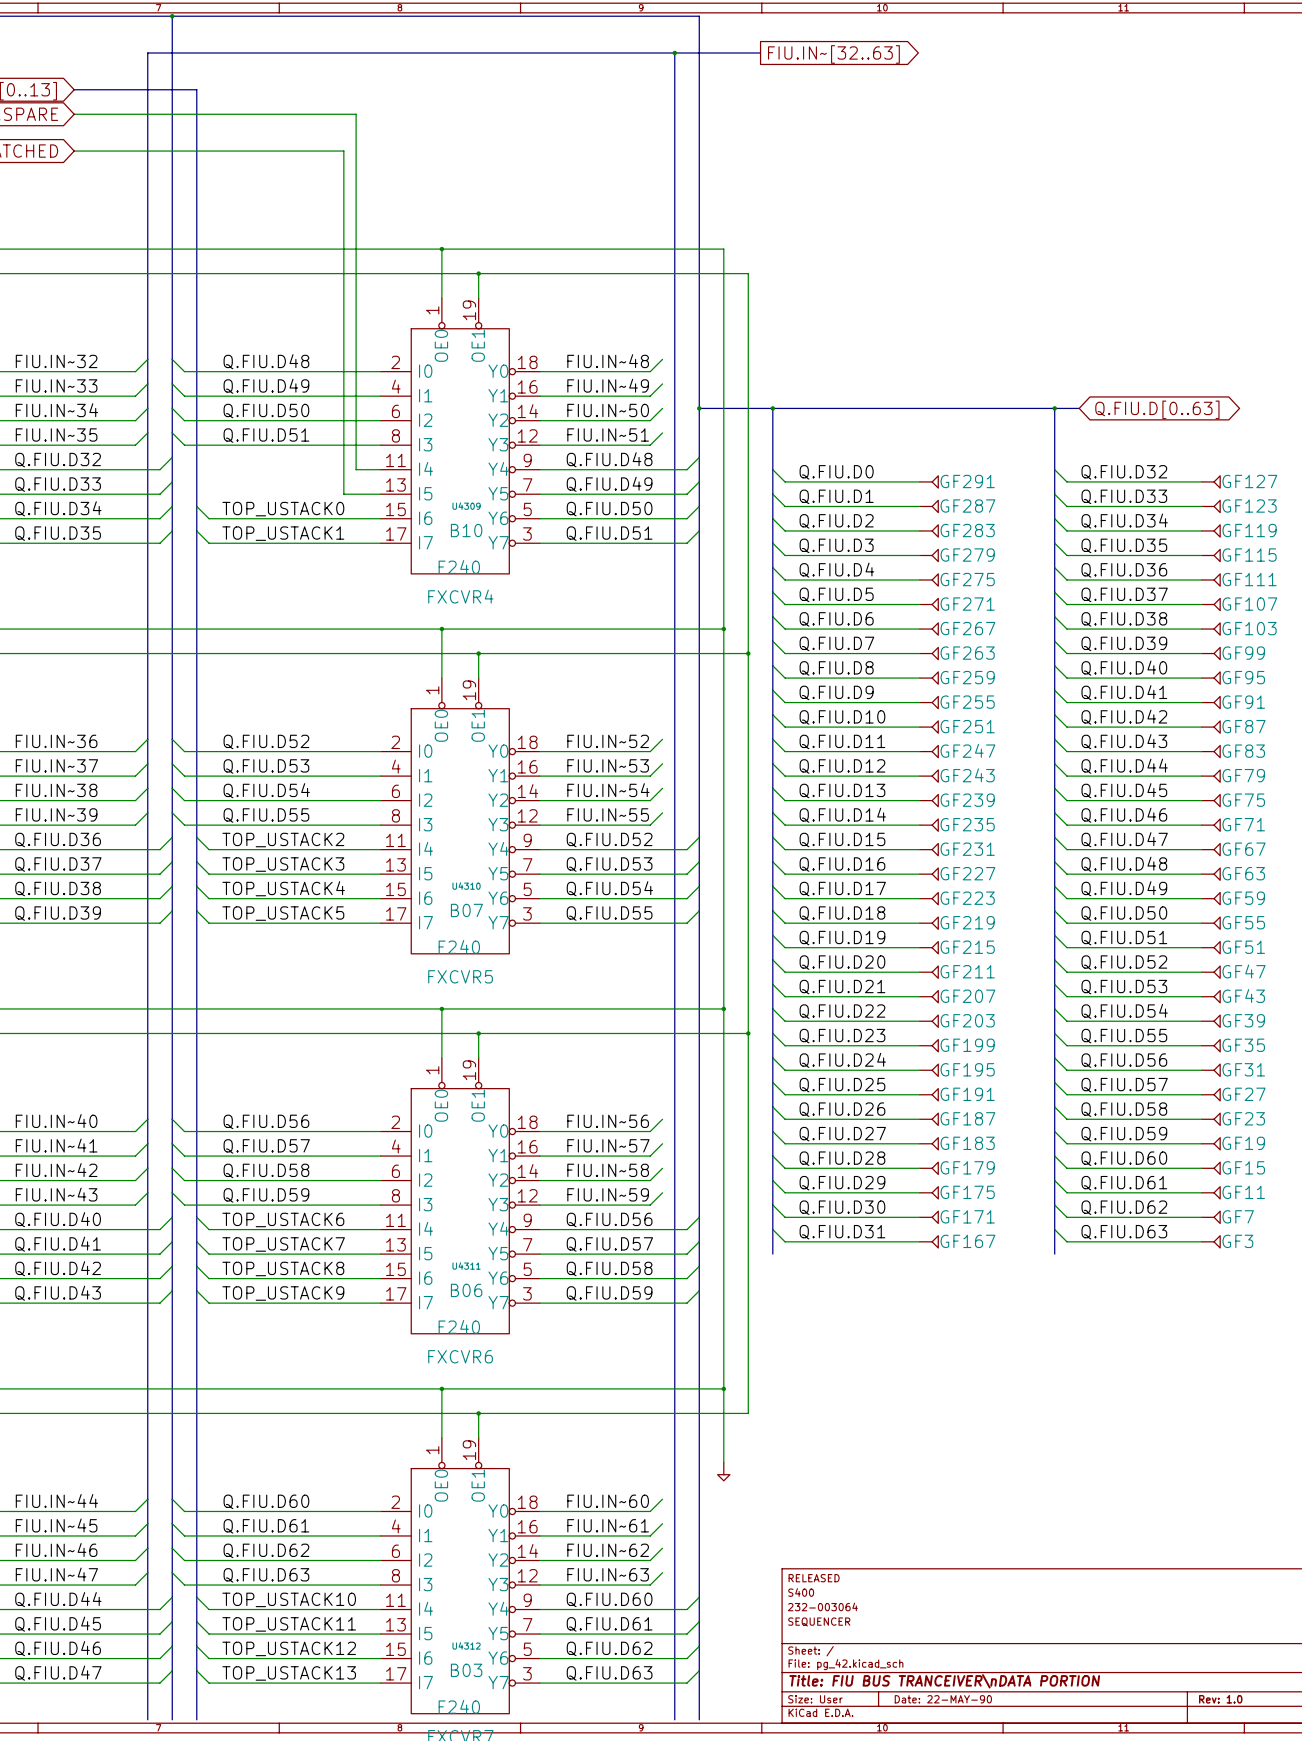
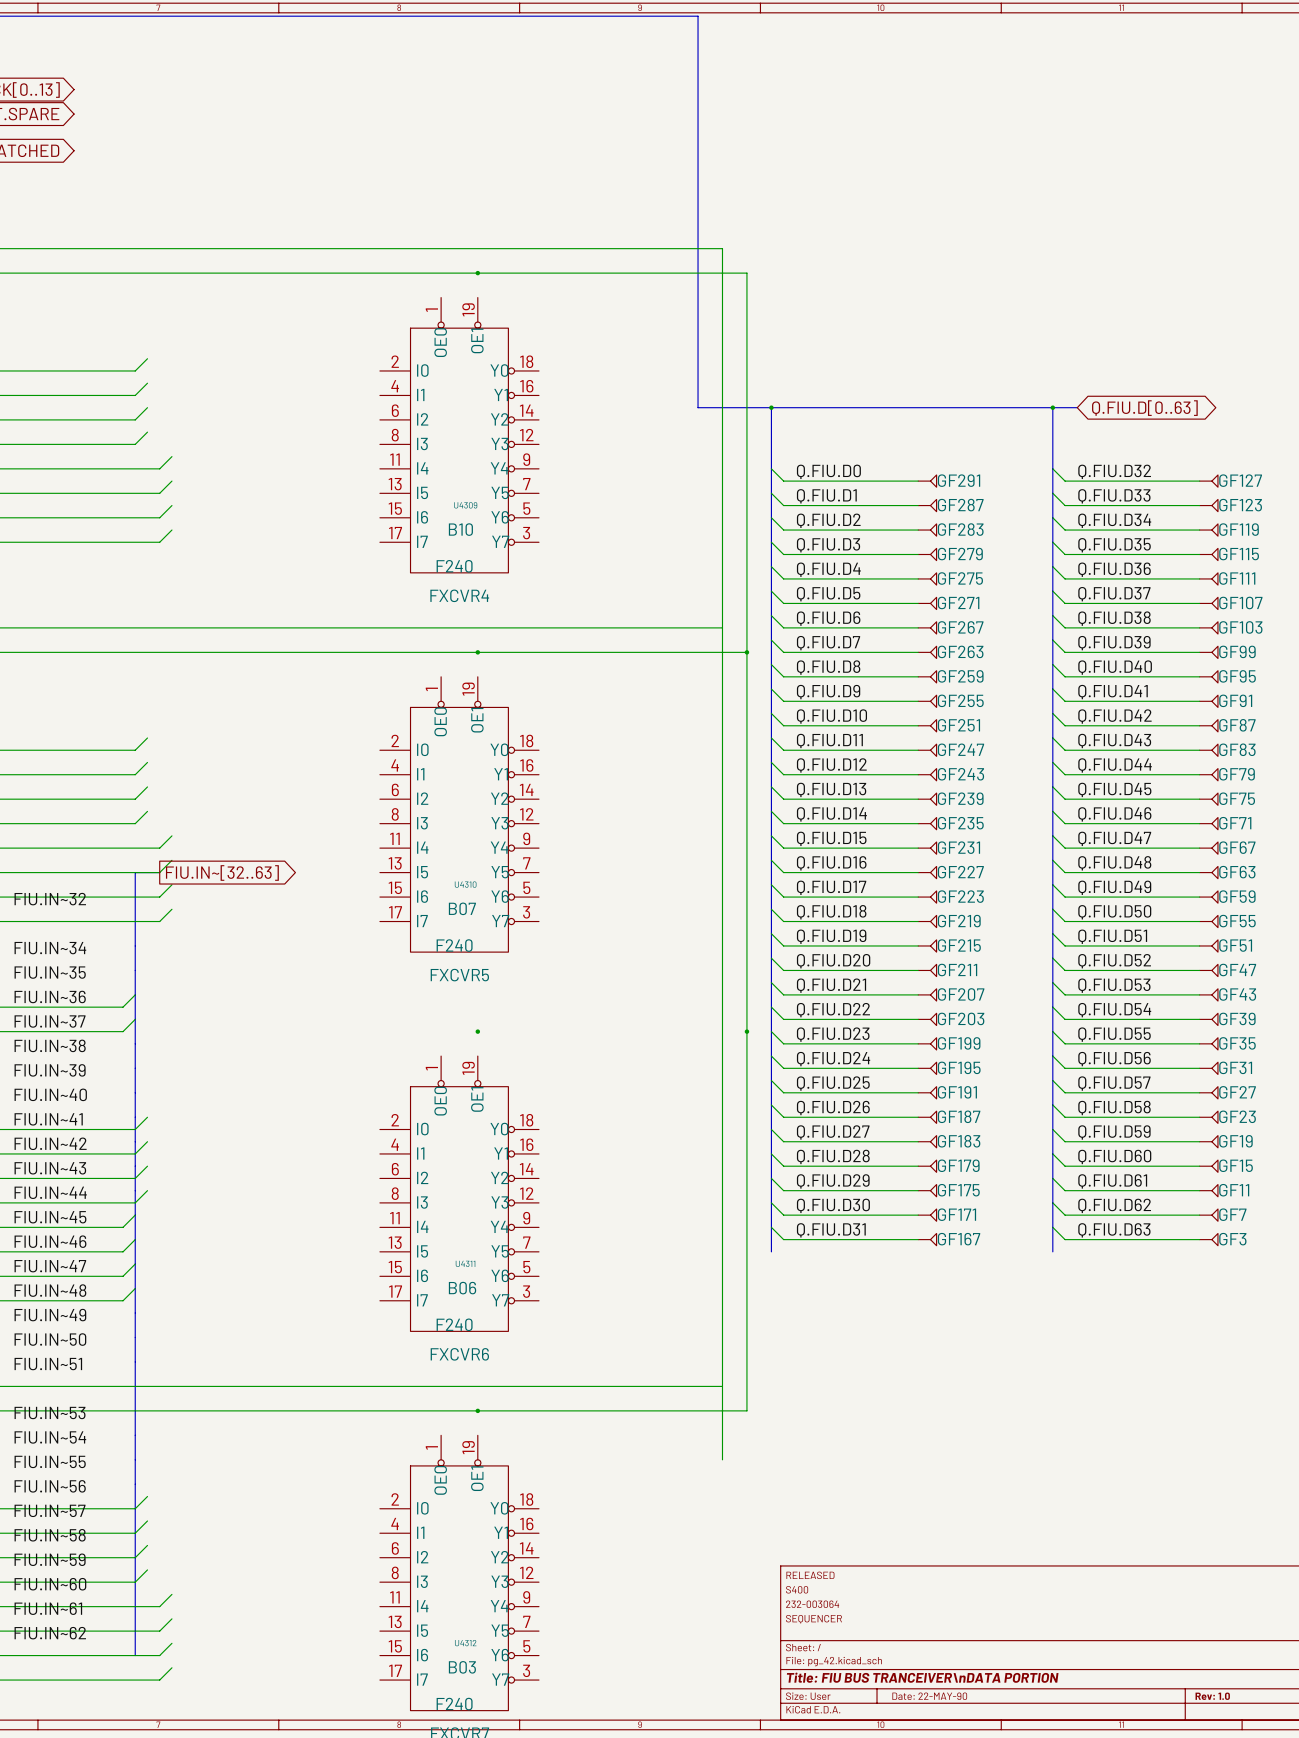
bus: (172, 16) (172, 1719) -> none
junction: (172, 16) -> none
bus: (674, 52) (674, 1719) -> none
junction: (674, 52) -> none
bus: (760, 52) (147, 52) (147, 1719) -> none
global label: FIU.IN~[32..63] (833, 54) -> none
bus: (74, 89) (196, 89) (196, 1719) -> none
wire: (74, 114) (356, 114) (356, 469) (380, 469) -> none
wire: (74, 151) (343, 151) (343, 494) (380, 494) -> none
wire: (441, 249) (441, 298) -> none
junction: (441, 249) -> none
wire: (478, 273) (478, 298) -> none
wire: (172, 359) (184, 371) (380, 371) -> none
wire: (662, 359) (650, 371) (539, 371) -> none
label: FIU.IN~32 (56, 361) -> none
label: Q.FIU.D48 (266, 361) -> none
label: FIU.IN~48 (608, 361) -> none
wire: (172, 383) (184, 396) (380, 396) -> none
wire: (662, 383) (650, 396) (539, 396) -> none
label: FIU.IN~33 (56, 385) -> none
label: FIU.IN~49 (608, 385) -> none
label: Q.FIU.D49 (266, 386) -> none
wire: (172, 408) (184, 420) (380, 420) -> none
wire: (662, 408) (650, 420) (539, 420) -> none
bus: (699, 408) (699, 1719) -> none
junction: (699, 408) -> none
label: FIU.IN~34 (56, 410) -> none
label: FIU.IN~50 (608, 410) -> none
label: Q.FIU.D50 (266, 411) -> none
wire: (172, 432) (184, 445) (380, 445) -> none
wire: (662, 432) (650, 445) (539, 445) -> none
label: FIU.IN~35 (56, 434) -> none
label: FIU.IN~51 (608, 434) -> none
label: Q.FIU.D51 (266, 435) -> none
wire: (699, 457) (687, 469) (539, 469) -> none
label: Q.FIU.D48 (609, 459) -> none
label: Q.FIU.D32 (58, 460) -> none
wire: (699, 481) (687, 494) (539, 494) -> none
label: Q.FIU.D33 (58, 484) -> none
label: Q.FIU.D49 (609, 484) -> none
wire: (196, 506) (209, 518) (380, 518) -> none
wire: (699, 506) (687, 518) (539, 518) -> none
label: Q.FIU.D34 (58, 508) -> none
label: TOP_USTACK0 (283, 509) -> none
label: Q.FIU.D50 (609, 509) -> none
wire: (196, 530) (209, 543) (380, 543) -> none
wire: (699, 530) (687, 543) (539, 543) -> none
label: Q.FIU.D35 (58, 533) -> none
label: TOP_USTACK1 (283, 533) -> none
label: Q.FIU.D51 (609, 533) -> none
wire: (441, 629) (441, 678) -> none
junction: (441, 629) -> none
junction: (723, 629) -> none
wire: (478, 653) (478, 678) -> none
wire: (172, 739) (184, 751) (380, 751) -> none
wire: (662, 739) (650, 751) (539, 751) -> none
label: FIU.IN~36 (56, 741) -> none
label: Q.FIU.D52 (266, 741) -> none
label: FIU.IN~52 (608, 741) -> none
wire: (172, 763) (184, 776) (380, 776) -> none
wire: (662, 763) (650, 776) (539, 776) -> none
label: FIU.IN~37 (56, 765) -> none
label: FIU.IN~53 (608, 765) -> none
label: Q.FIU.D53 (266, 766) -> none
wire: (172, 788) (184, 800) (380, 800) -> none
wire: (662, 788) (650, 800) (539, 800) -> none
label: FIU.IN~38 (56, 790) -> none
label: Q.FIU.D54 (266, 790) -> none
label: FIU.IN~54 (608, 790) -> none
wire: (172, 812) (184, 825) (380, 825) -> none
wire: (662, 812) (650, 825) (539, 825) -> none
label: FIU.IN~39 (56, 814) -> none
label: FIU.IN~55 (608, 814) -> none
label: Q.FIU.D55 (266, 815) -> none
wire: (196, 837) (209, 849) (380, 849) -> none
wire: (699, 837) (687, 849) (539, 849) -> none
label: Q.FIU.D36 (58, 840) -> none
label: TOP_USTACK2 (283, 840) -> none
label: Q.FIU.D52 (609, 840) -> none
wire: (196, 861) (209, 874) (380, 874) -> none
wire: (699, 861) (687, 874) (539, 874) -> none
label: Q.FIU.D37 (58, 864) -> none
label: TOP_USTACK3 (283, 864) -> none
label: Q.FIU.D53 (609, 864) -> none
bus: none -> (159, 872) (135, 872) (135, 1655)
global label: none -> FIU.IN~[32..63] (222, 872)
wire: (196, 886) (209, 898) (380, 898) -> none
wire: (699, 886) (687, 898) (539, 898) -> none
label: TOP_USTACK4 (283, 888) -> none
label: Q.FIU.D54 (609, 888) -> none
label: Q.FIU.D38 (58, 889) -> none
label: none -> FIU.IN~32 (50, 899)
wire: (196, 910) (209, 923) (380, 923) -> none
wire: (699, 910) (687, 923) (539, 923) -> none
label: Q.FIU.D39 (58, 913) -> none
label: TOP_USTACK5 (283, 913) -> none
label: Q.FIU.D55 (609, 913) -> none
label: none -> FIU.IN~34 (50, 948)
label: none -> FIU.IN~35 (50, 972)
label: none -> FIU.IN~36 (50, 996)
wire: (123, 1008) (723, 1008) -> (123, 1007) (135, 994)
wire: (441, 1008) (441, 1057) -> none
junction: (441, 1008) -> none
junction: (723, 1008) -> none
label: none -> FIU.IN~37 (50, 1021)
wire: (123, 1033) (748, 1033) -> (123, 1031) (135, 1019)
wire: (478, 1033) (478, 1057) -> none
label: none -> FIU.IN~38 (50, 1045)
label: none -> FIU.IN~39 (50, 1070)
label: none -> FIU.IN~40 (50, 1094)
wire: (172, 1119) (184, 1131) (380, 1131) -> none
wire: (662, 1119) (650, 1131) (539, 1131) -> none
label: FIU.IN~40 (56, 1121) -> FIU.IN~41 (48, 1119)
label: Q.FIU.D56 (266, 1121) -> none
label: FIU.IN~56 (608, 1121) -> none
wire: (172, 1143) (184, 1156) (380, 1156) -> none
wire: (662, 1143) (650, 1156) (539, 1156) -> none
label: FIU.IN~41 (56, 1145) -> FIU.IN~42 (50, 1143)
label: FIU.IN~57 (608, 1145) -> none
label: Q.FIU.D57 (266, 1146) -> none
wire: (172, 1168) (184, 1180) (380, 1180) -> none
wire: (662, 1168) (650, 1180) (539, 1180) -> none
label: FIU.IN~42 (56, 1170) -> FIU.IN~43 (50, 1168)
label: Q.FIU.D58 (266, 1170) -> none
label: FIU.IN~58 (608, 1170) -> none
wire: (172, 1192) (184, 1205) (380, 1205) -> none
wire: (662, 1192) (650, 1205) (539, 1205) -> none
label: FIU.IN~43 (56, 1194) -> FIU.IN~44 (50, 1192)
label: FIU.IN~59 (608, 1194) -> none
label: Q.FIU.D59 (266, 1195) -> none
wire: (172, 1217) (160, 1229) (123, 1229) -> (135, 1215) (123, 1227)
wire: (196, 1217) (209, 1229) (380, 1229) -> none
wire: (699, 1217) (687, 1229) (539, 1229) -> none
label: Q.FIU.D40 (58, 1219) -> FIU.IN~45 (50, 1217)
label: TOP_USTACK6 (283, 1219) -> none
label: Q.FIU.D56 (609, 1219) -> none
wire: (172, 1241) (160, 1254) (123, 1254) -> (135, 1239) (123, 1251)
wire: (196, 1241) (209, 1254) (380, 1254) -> none
wire: (699, 1241) (687, 1254) (539, 1254) -> none
label: Q.FIU.D41 (58, 1244) -> FIU.IN~46 (50, 1241)
label: TOP_USTACK7 (283, 1244) -> none
label: Q.FIU.D57 (609, 1244) -> none
wire: (172, 1266) (160, 1278) (123, 1278) -> (135, 1264) (123, 1276)
wire: (196, 1266) (209, 1278) (380, 1278) -> none
wire: (699, 1266) (687, 1278) (539, 1278) -> none
label: Q.FIU.D42 (58, 1268) -> FIU.IN~47 (50, 1266)
label: TOP_USTACK8 (283, 1268) -> none
label: Q.FIU.D58 (609, 1268) -> none
wire: (172, 1290) (160, 1303) (123, 1303) -> (135, 1288) (123, 1300)
wire: (196, 1290) (209, 1303) (380, 1303) -> none
wire: (699, 1290) (687, 1303) (539, 1303) -> none
label: Q.FIU.D43 (58, 1293) -> FIU.IN~48 (50, 1290)
label: TOP_USTACK9 (283, 1293) -> none
label: Q.FIU.D59 (609, 1293) -> none
label: none -> FIU.IN~49 (50, 1315)
label: none -> FIU.IN~50 (50, 1339)
label: none -> FIU.IN~51 (48, 1364)
wire: (441, 1388) (441, 1437) -> none
junction: (441, 1388) -> none
junction: (723, 1388) -> none
wire: (478, 1413) (478, 1437) -> none
label: none -> FIU.IN~53 (50, 1413)
label: none -> FIU.IN~54 (50, 1437)
label: none -> FIU.IN~55 (50, 1461)
power symbol: (723, 1471) -> none
label: none -> FIU.IN~56 (50, 1486)
wire: (172, 1499) (184, 1511) (380, 1511) -> none
wire: (662, 1499) (650, 1511) (539, 1511) -> none
label: FIU.IN~44 (56, 1500) -> none
label: Q.FIU.D60 (266, 1501) -> none
label: FIU.IN~60 (608, 1501) -> none
label: none -> FIU.IN~57 (50, 1510)
wire: (172, 1523) (184, 1535) (380, 1535) -> none
wire: (662, 1523) (650, 1535) (539, 1535) -> none
label: FIU.IN~45 (56, 1525) -> none
label: FIU.IN~61 (608, 1525) -> none
label: Q.FIU.D61 (266, 1526) -> none
label: none -> FIU.IN~58 (50, 1535)
wire: (172, 1548) (184, 1560) (380, 1560) -> none
wire: (662, 1548) (650, 1560) (539, 1560) -> none
label: FIU.IN~46 (56, 1550) -> none
label: Q.FIU.D62 (266, 1550) -> none
label: FIU.IN~62 (608, 1550) -> none
label: none -> FIU.IN~59 (50, 1559)
wire: (172, 1572) (184, 1585) (380, 1585) -> none
wire: (662, 1572) (650, 1585) (539, 1585) -> none
label: FIU.IN~47 (56, 1574) -> none
label: FIU.IN~63 (608, 1574) -> none
label: Q.FIU.D63 (266, 1575) -> none
label: none -> FIU.IN~60 (50, 1584)
wire: (196, 1597) (209, 1609) (380, 1609) -> none
wire: (699, 1597) (687, 1609) (539, 1609) -> none
label: Q.FIU.D44 (58, 1599) -> none
label: TOP_USTACK10 (289, 1599) -> none
label: Q.FIU.D60 (609, 1599) -> none
label: none -> FIU.IN~61 (48, 1608)
wire: (196, 1621) (209, 1634) (380, 1634) -> none
wire: (699, 1621) (687, 1634) (539, 1634) -> none
label: Q.FIU.D45 (58, 1624) -> none
label: TOP_USTACK11 (289, 1624) -> none
label: Q.FIU.D61 (609, 1624) -> none
label: none -> FIU.IN~62 (50, 1633)
wire: (196, 1646) (209, 1658) (380, 1658) -> none
wire: (699, 1646) (687, 1658) (539, 1658) -> none
label: Q.FIU.D46 (58, 1648) -> none
label: TOP_USTACK12 (289, 1648) -> none
label: Q.FIU.D62 (609, 1648) -> none
wire: (196, 1670) (209, 1683) (380, 1683) -> none
wire: (699, 1670) (687, 1683) (539, 1683) -> none
label: Q.FIU.D47 (58, 1673) -> none
label: TOP_USTACK13 (289, 1673) -> none
label: Q.FIU.D63 (609, 1673) -> none

